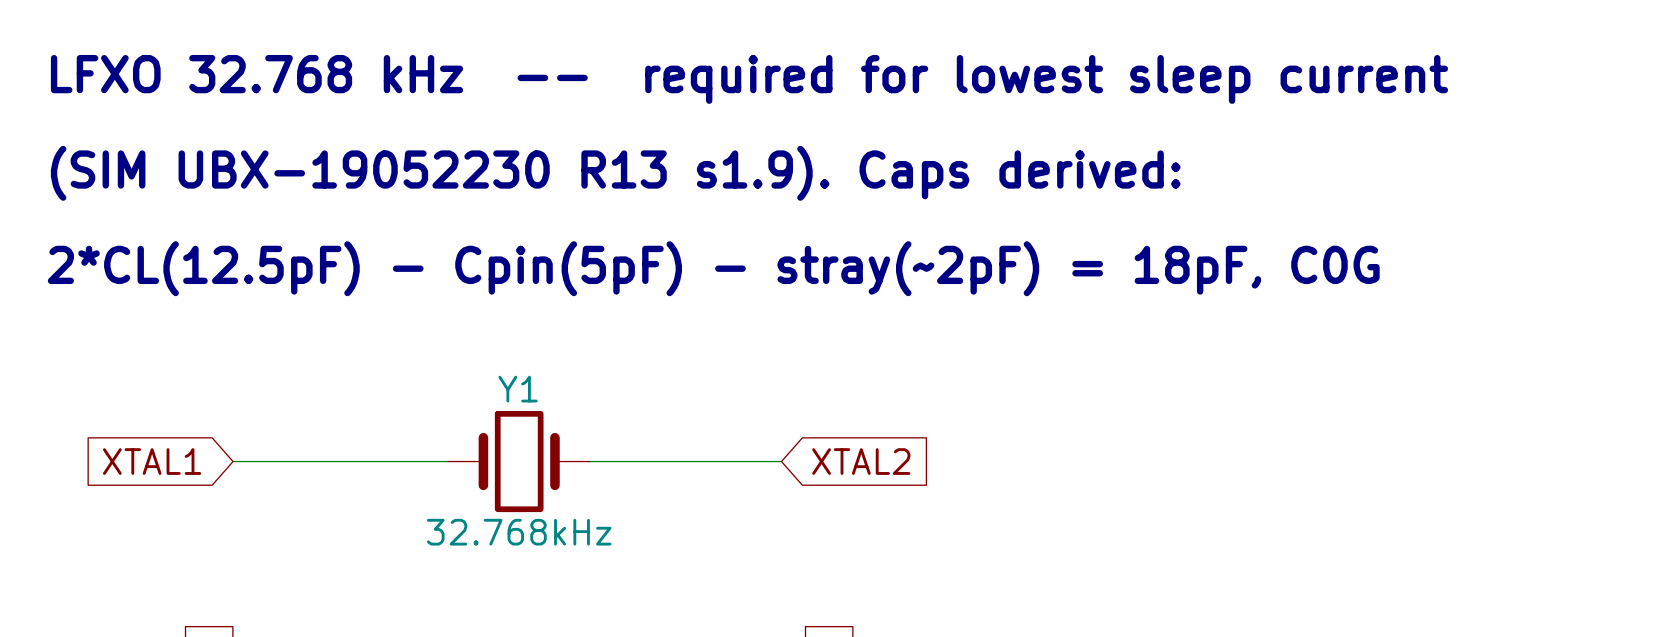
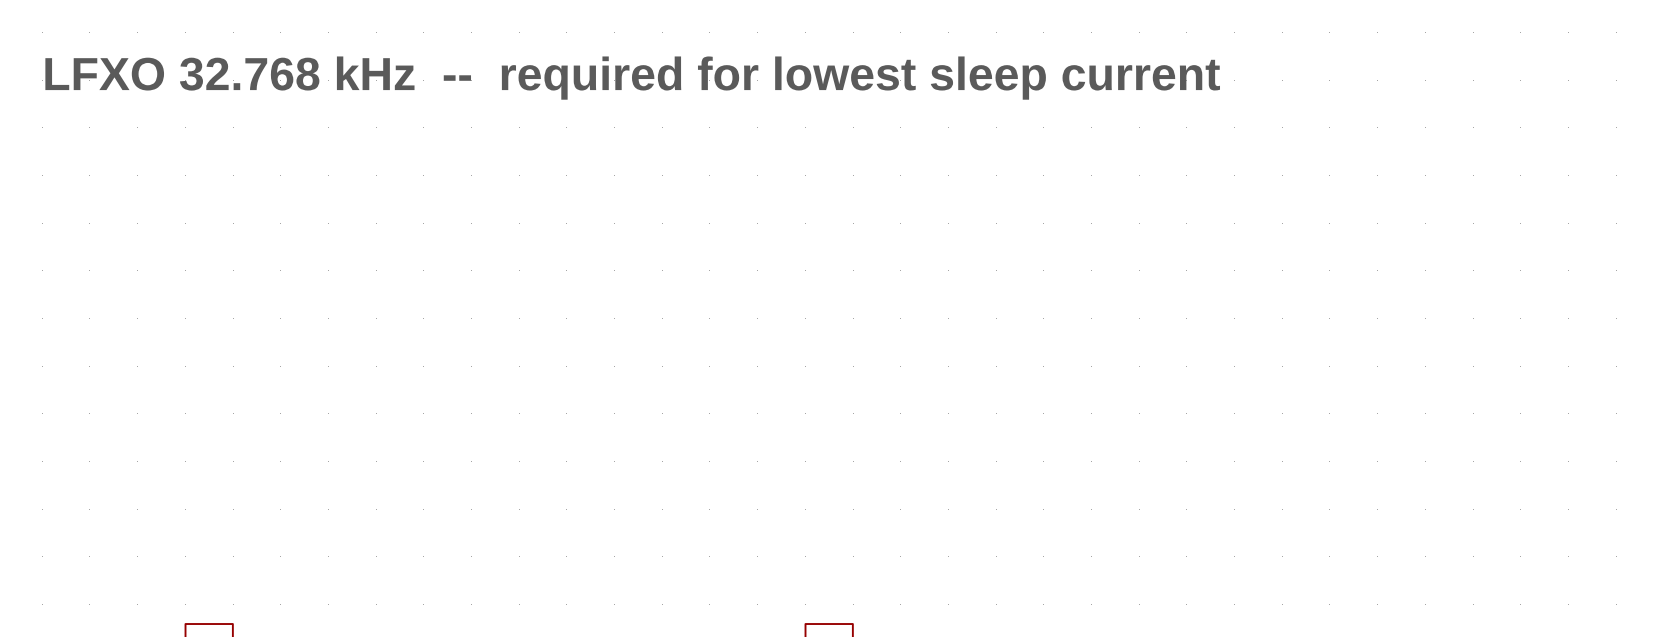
text: (SIM UBX-19052230 R13 s1.9). Caps derived: (615, 173) -> none
text: 2*CL(12.5pF) - Cpin(5pF) - stray(~2pF) = 18pF, C0G (713, 268) -> none
global label: XTAL1 (152, 461) -> none
wire: (233, 461) (447, 461) -> none
Y1: 32.768kHz (519, 461) -> none
wire: (590, 461) (781, 461) -> none
global label: XTAL2 (861, 461) -> none

